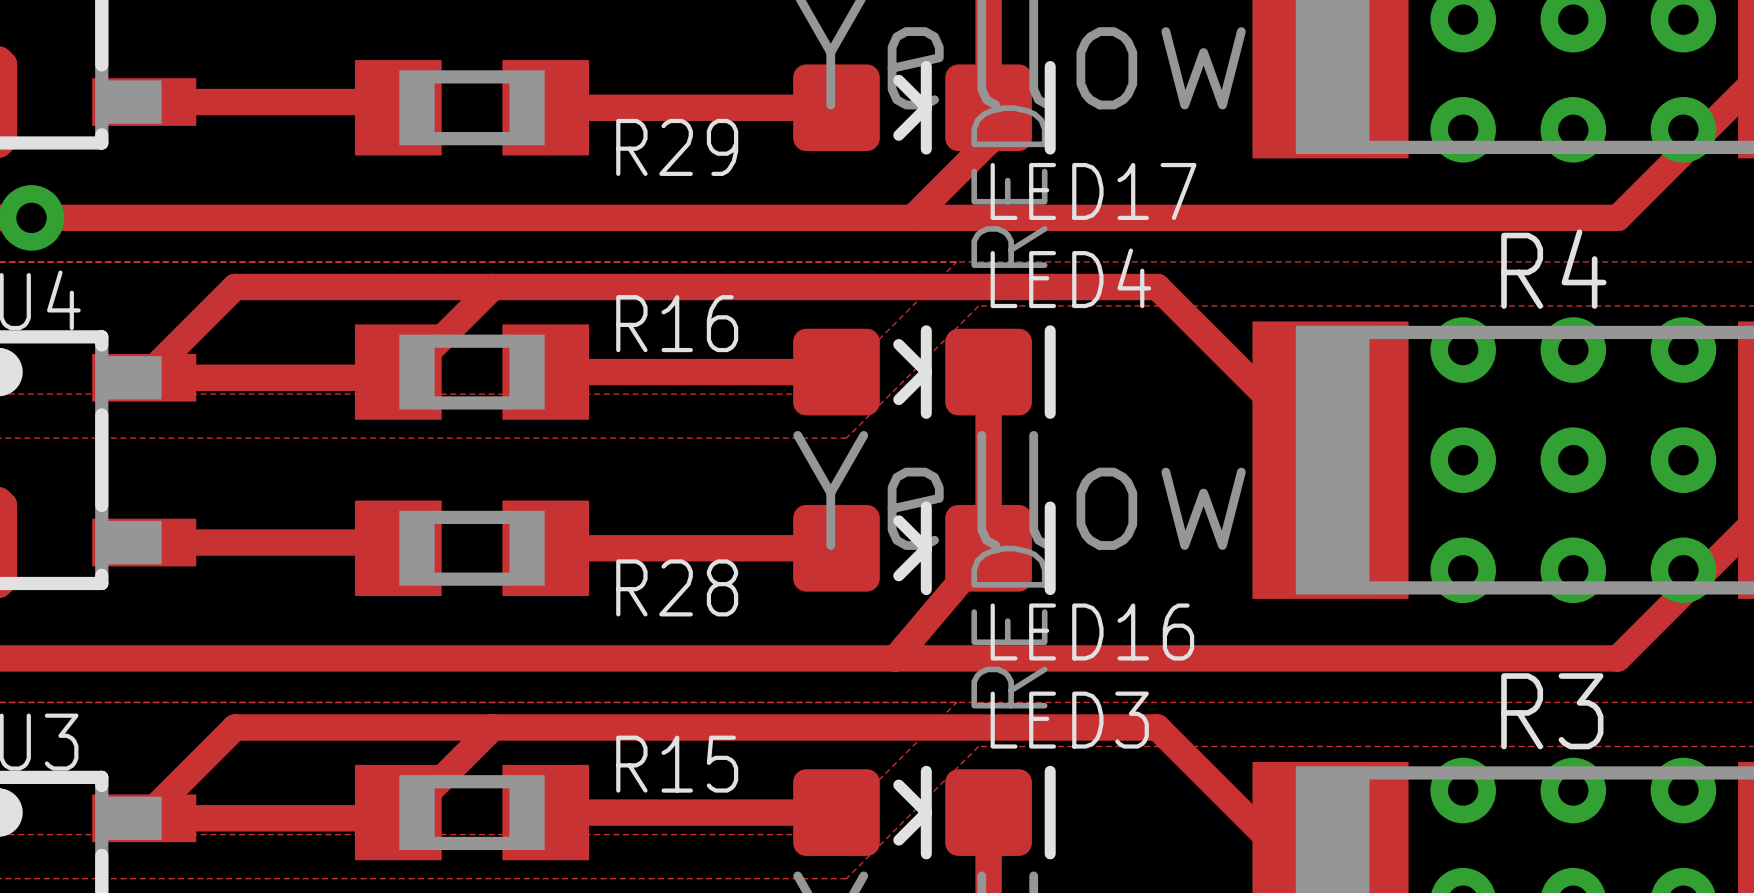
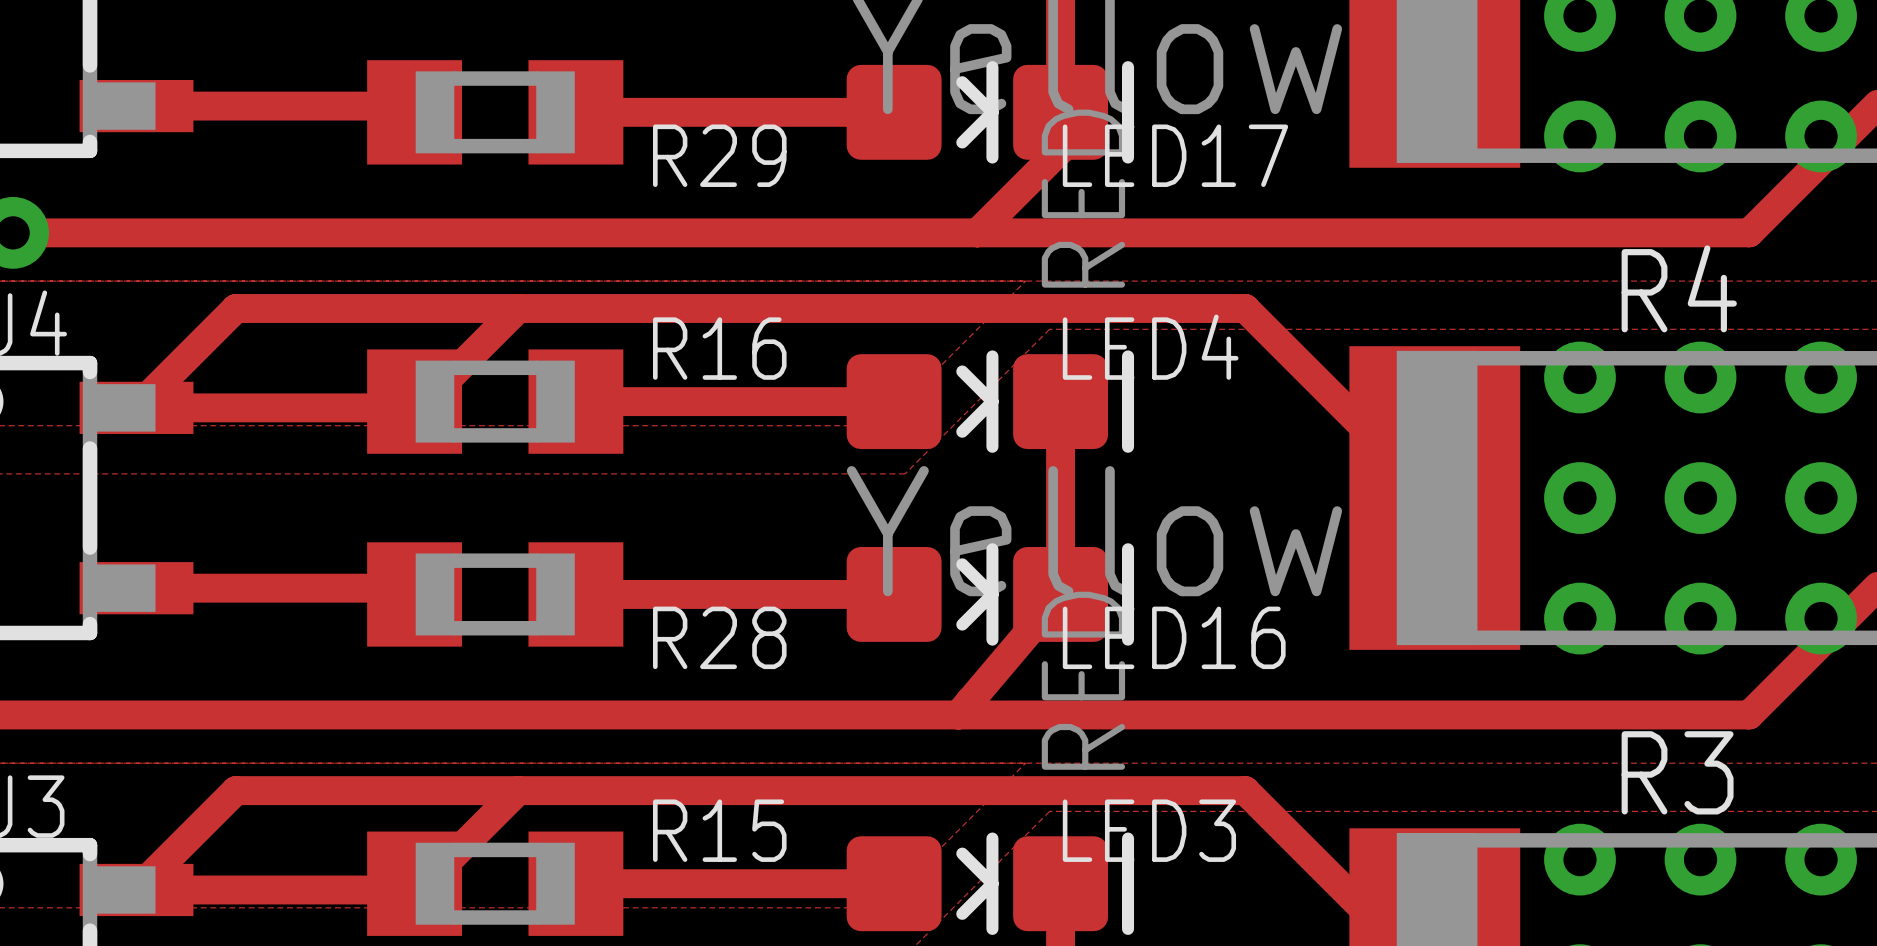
LED17 name position: LED17 (1093, 191) -> LED17 (1175, 155)
LED4 name position: LED4 (1070, 278) -> LED4 (1150, 347)
LED16 name position: LED16 (1092, 631) -> LED16 (1174, 637)
LED3 name position: LED3 (1069, 720) -> LED3 (1149, 830)

